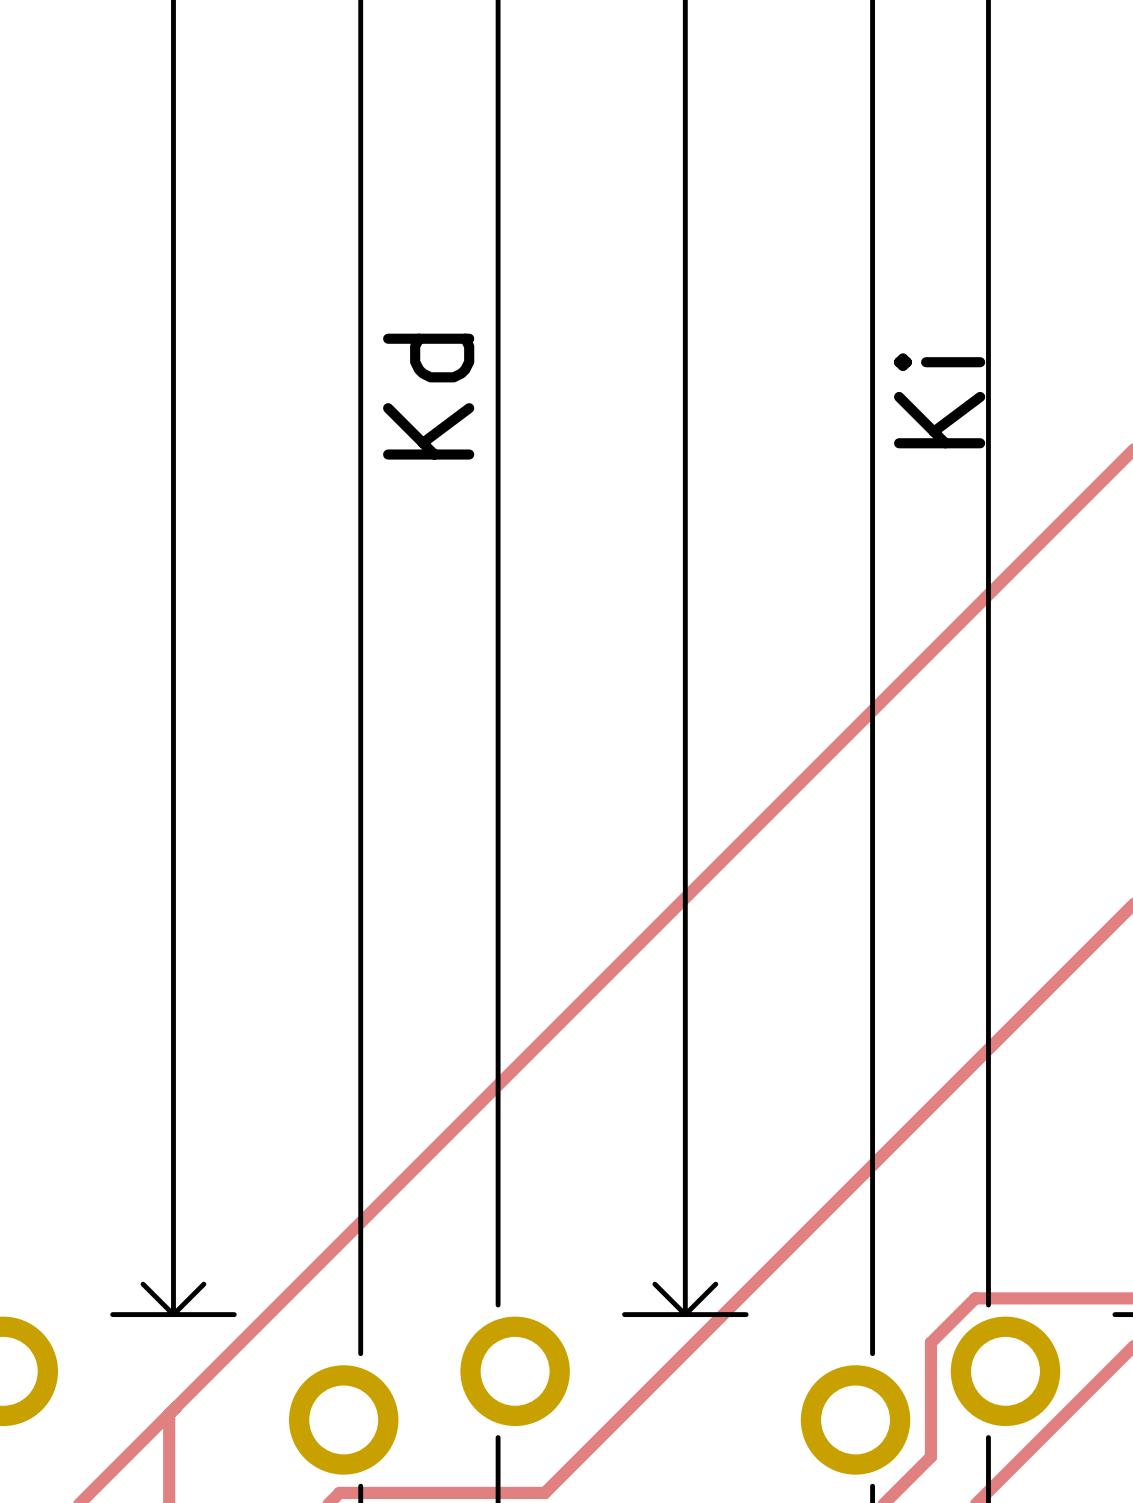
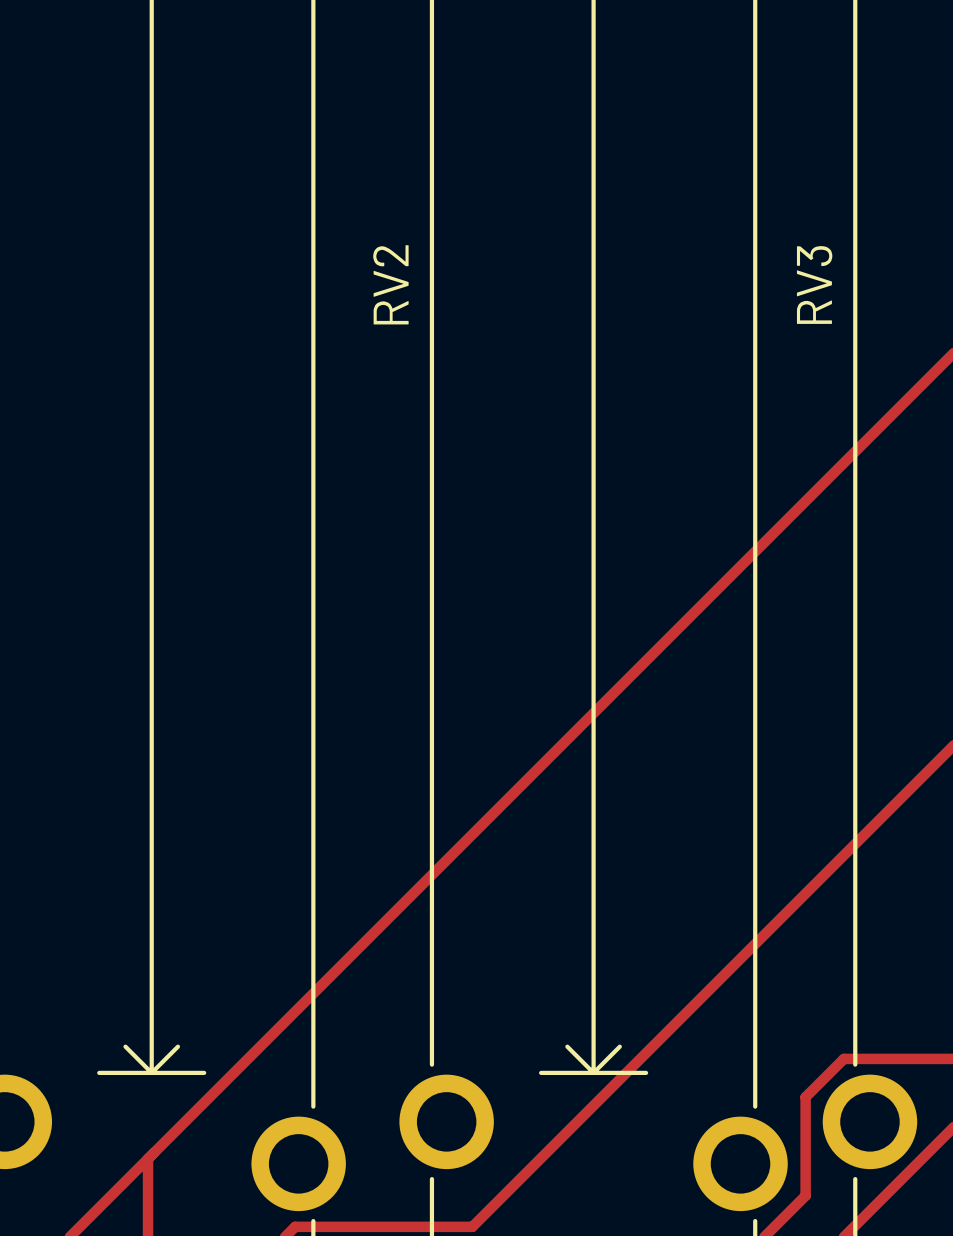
Kd name: Kd (428, 396) -> RV2 (390, 284)
Ki name: Ki (939, 400) -> RV3 (814, 285)

